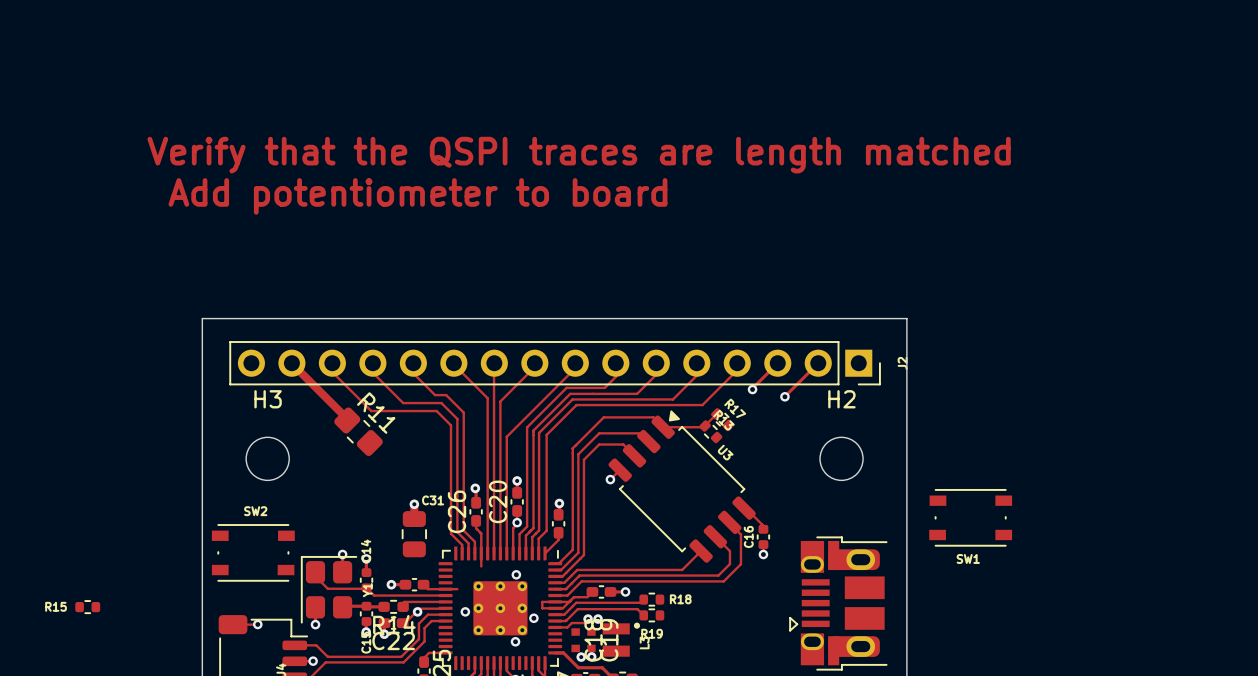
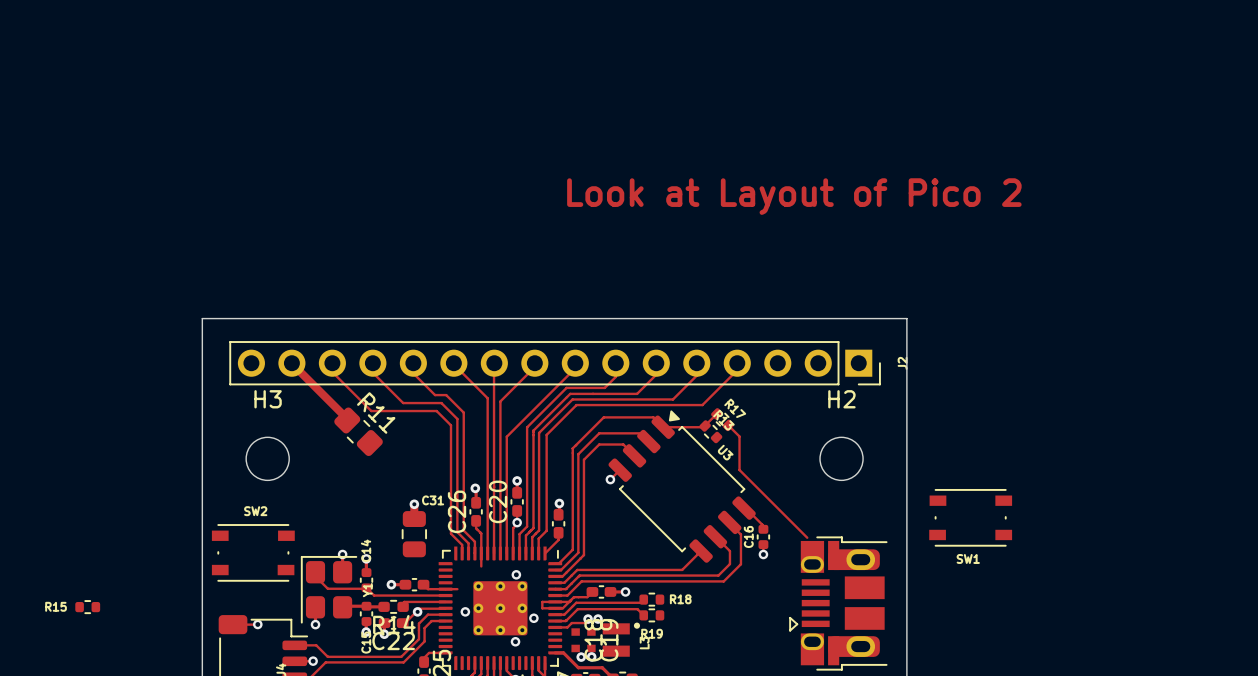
text: Verify that the QSPI traces are length matched (579, 155) -> none
text: Add potentiometer to board (417, 196) -> none
text: none -> Look at Layout of Pico 2 (794, 196)
track: (777, 363) (752, 389) -> none
track: (818, 363) (784, 396) -> none
via: (752, 389) -> none
via: (784, 396) -> none
track: none -> (728, 425) (739, 436) (739, 470) (807, 537)

